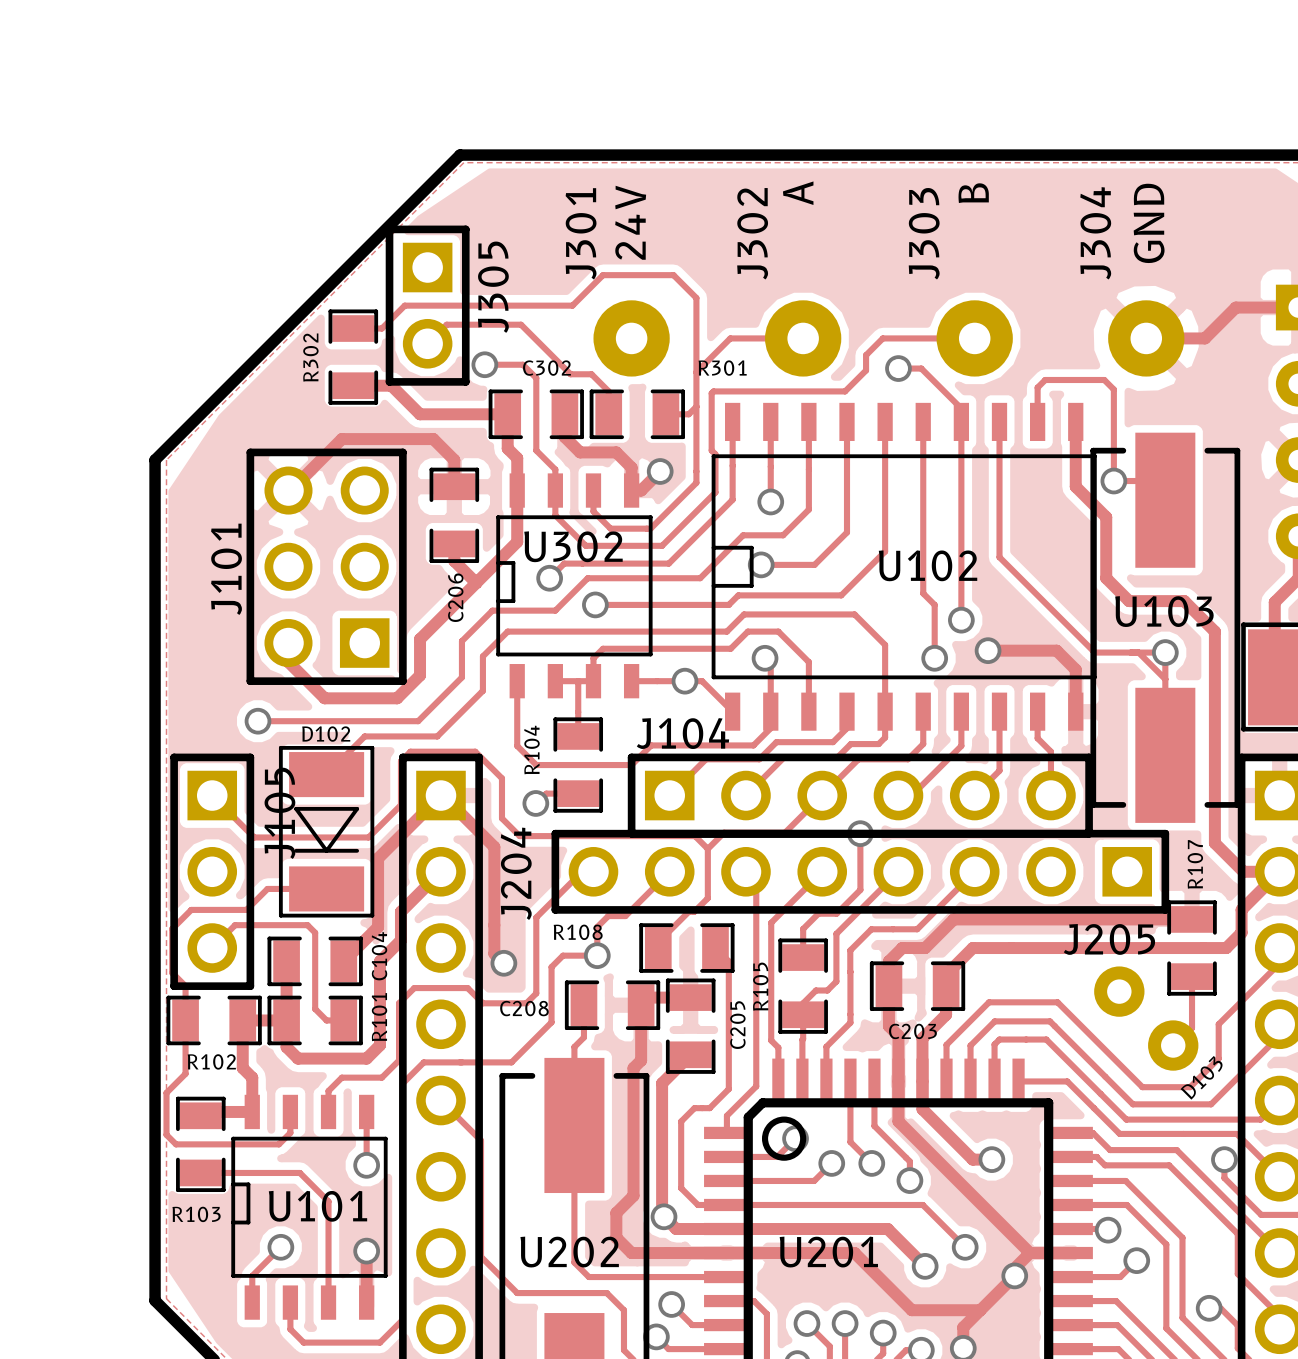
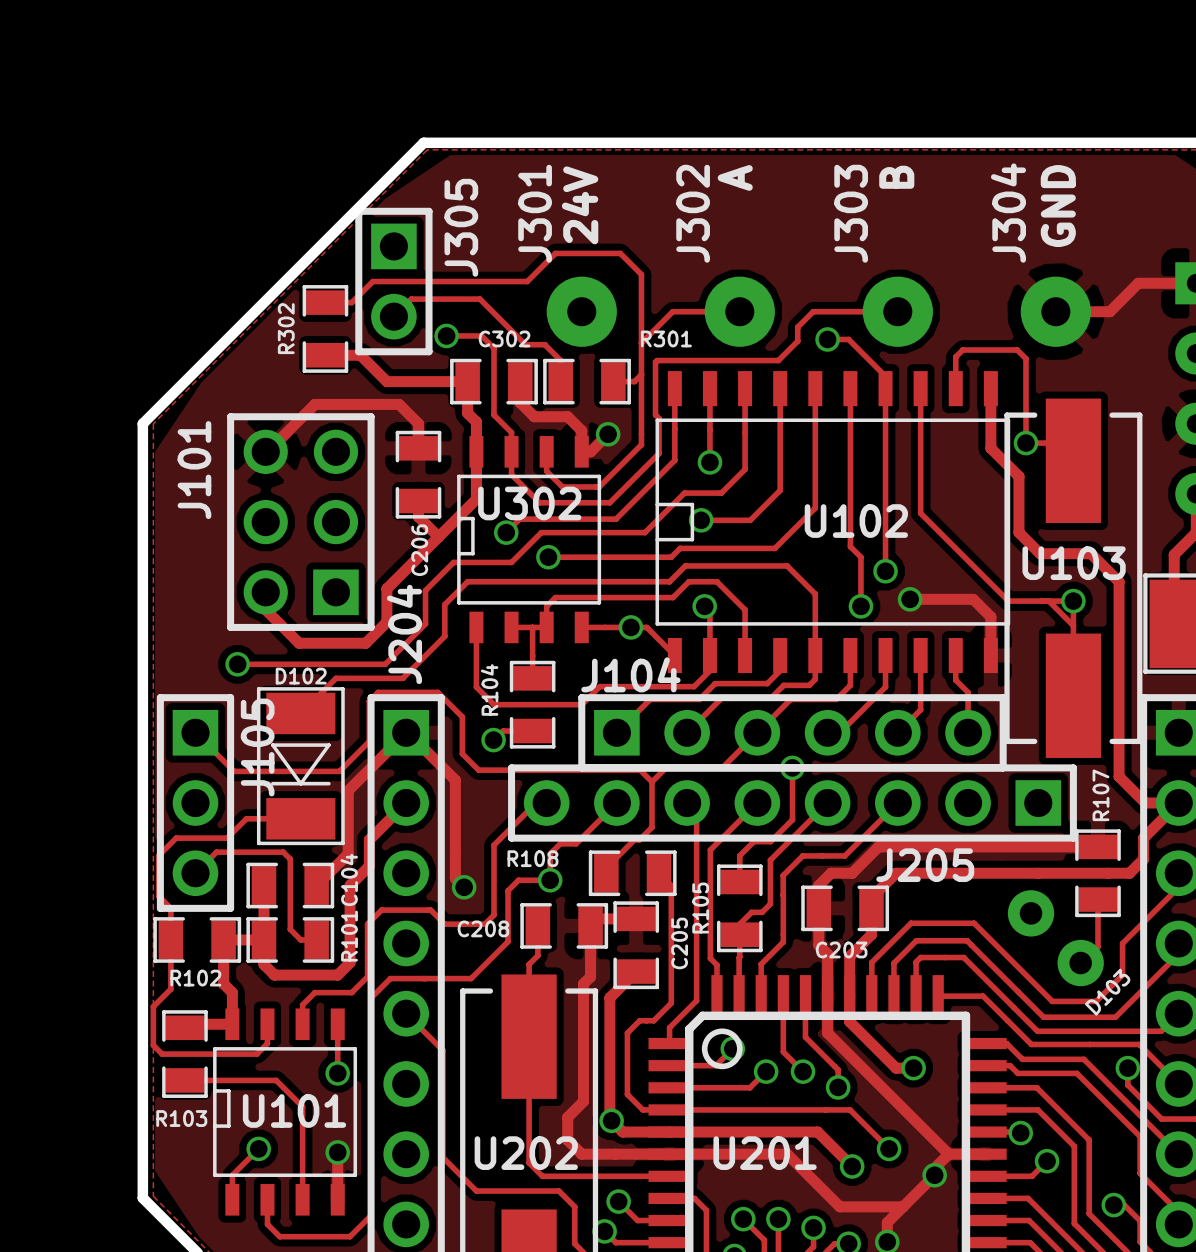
J305 name position: J305 (493, 287) -> J305 (461, 227)
J101 name position: J101 (226, 569) -> J101 (194, 470)
J204 name position: J204 (516, 873) -> J204 (404, 634)
J205 name position: J205 (1109, 939) -> J205 (925, 865)

